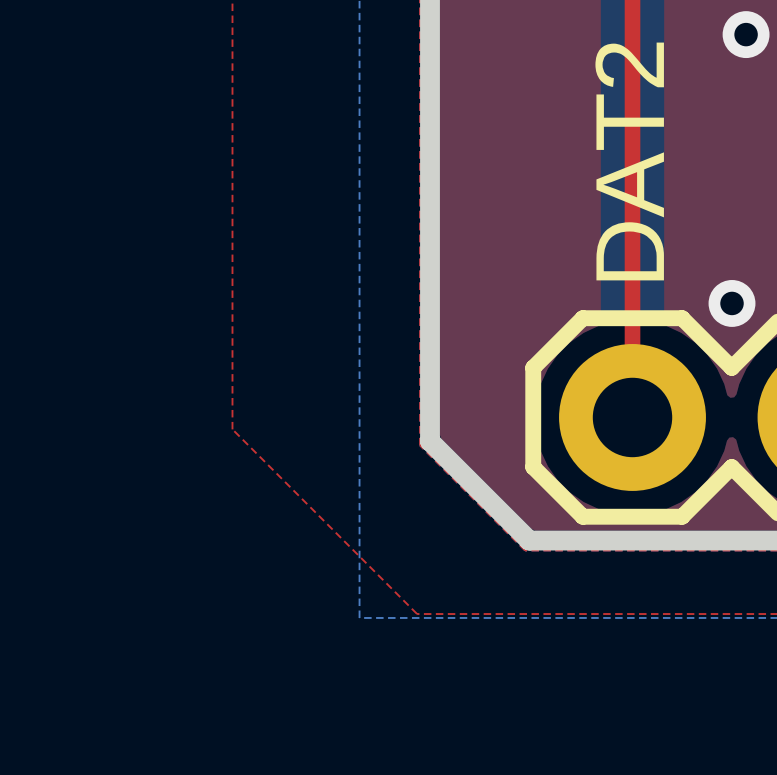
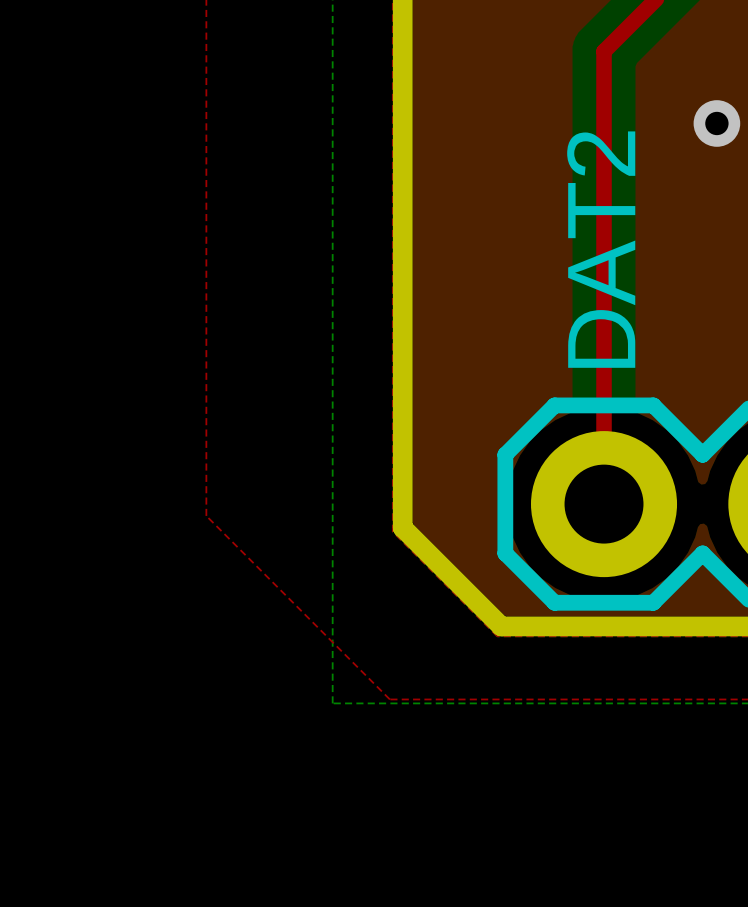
via: (732, 303) -> none

